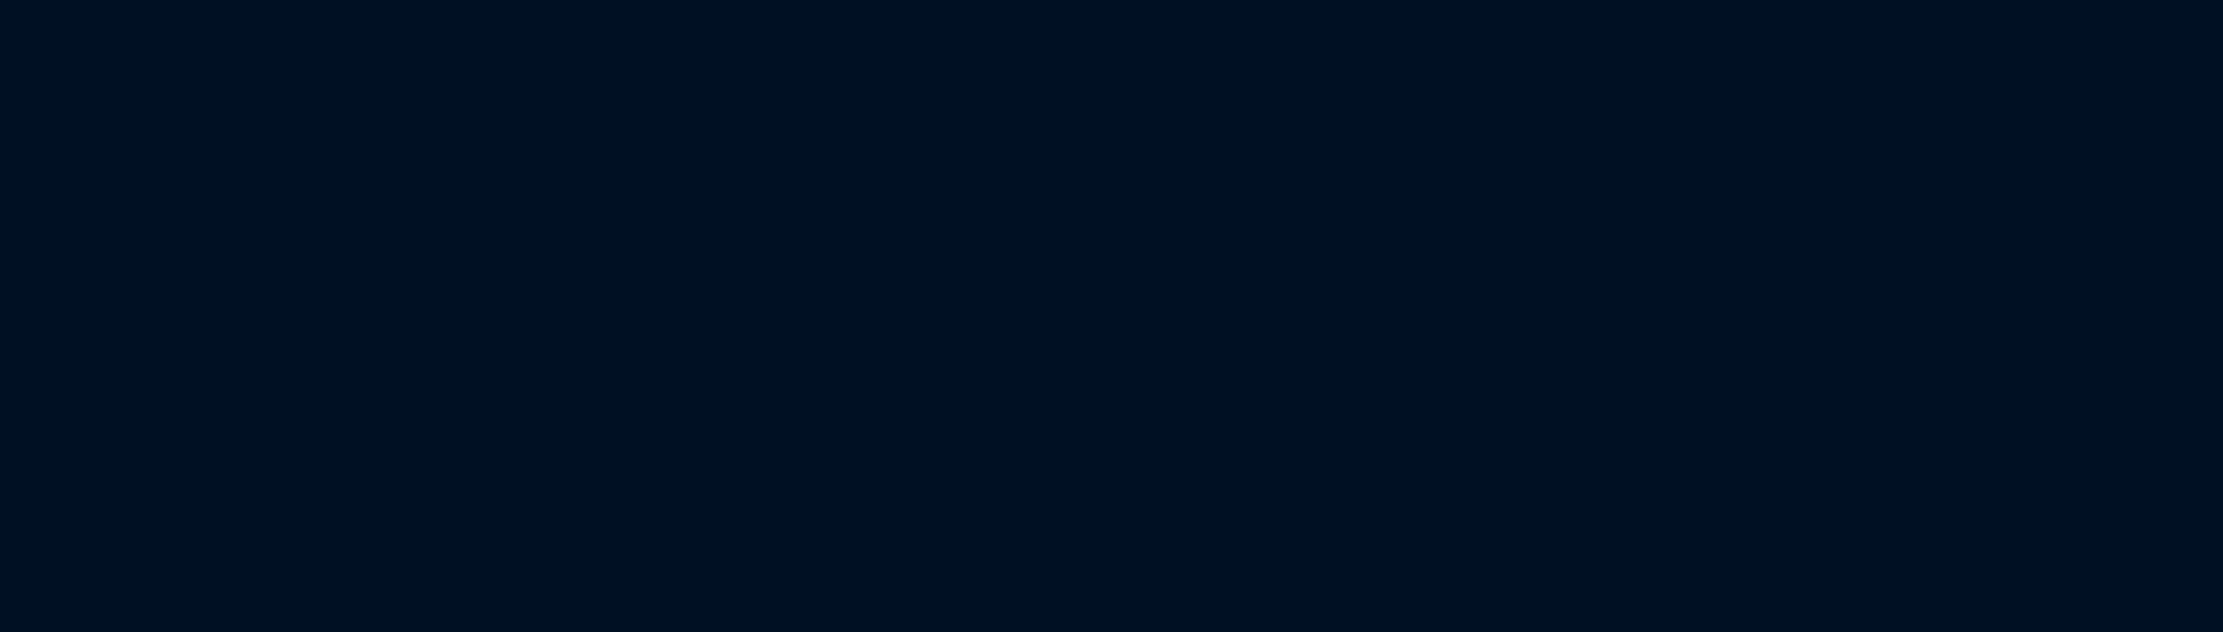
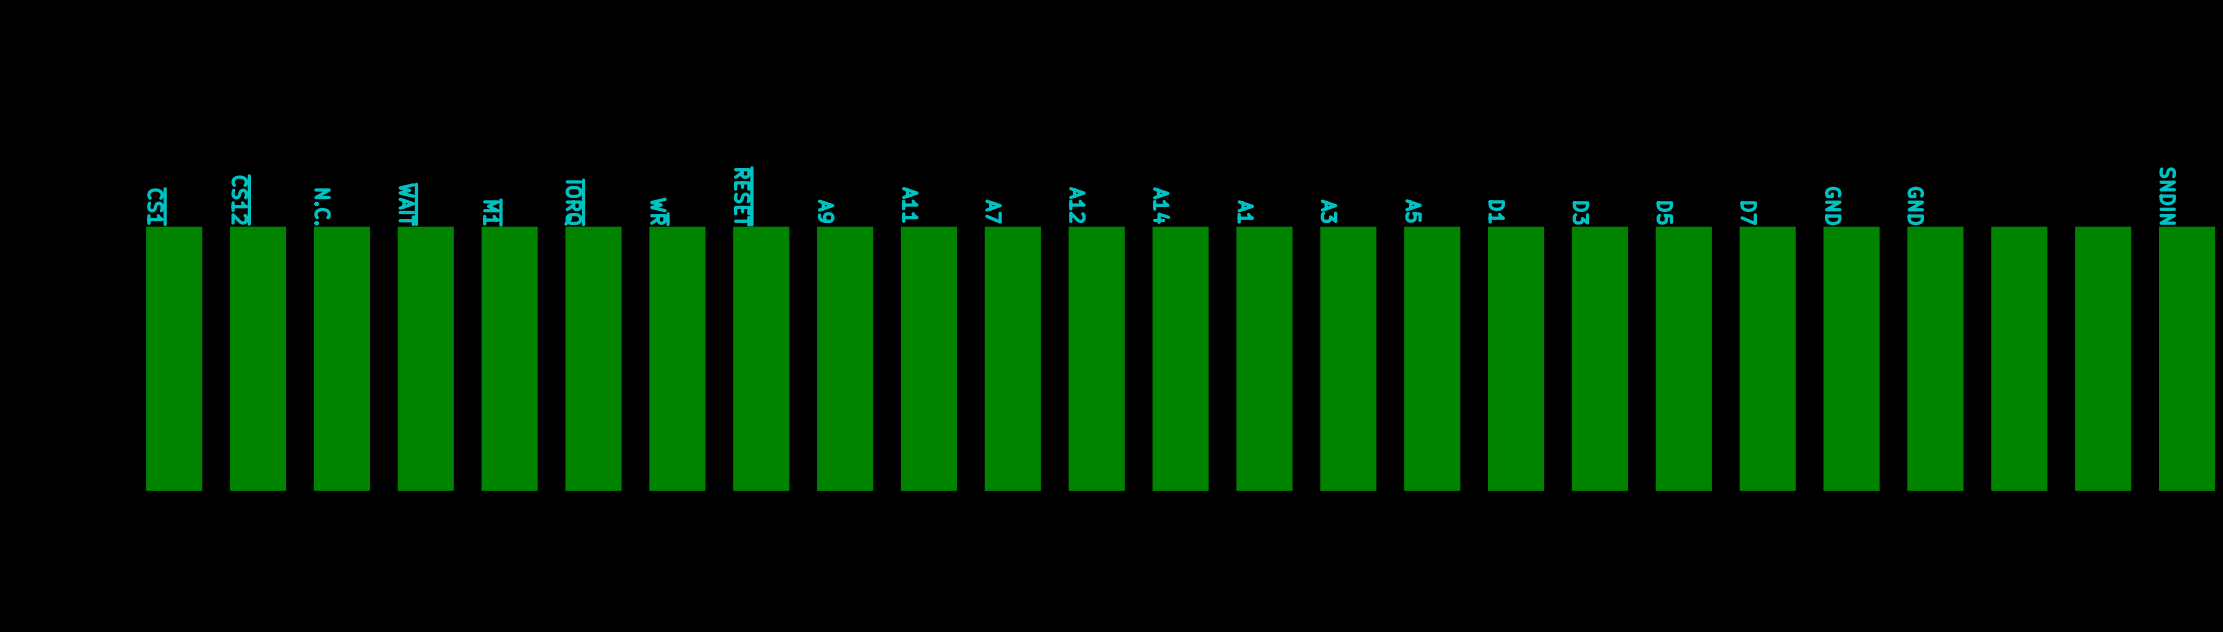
part: none -> (1180, 358)

